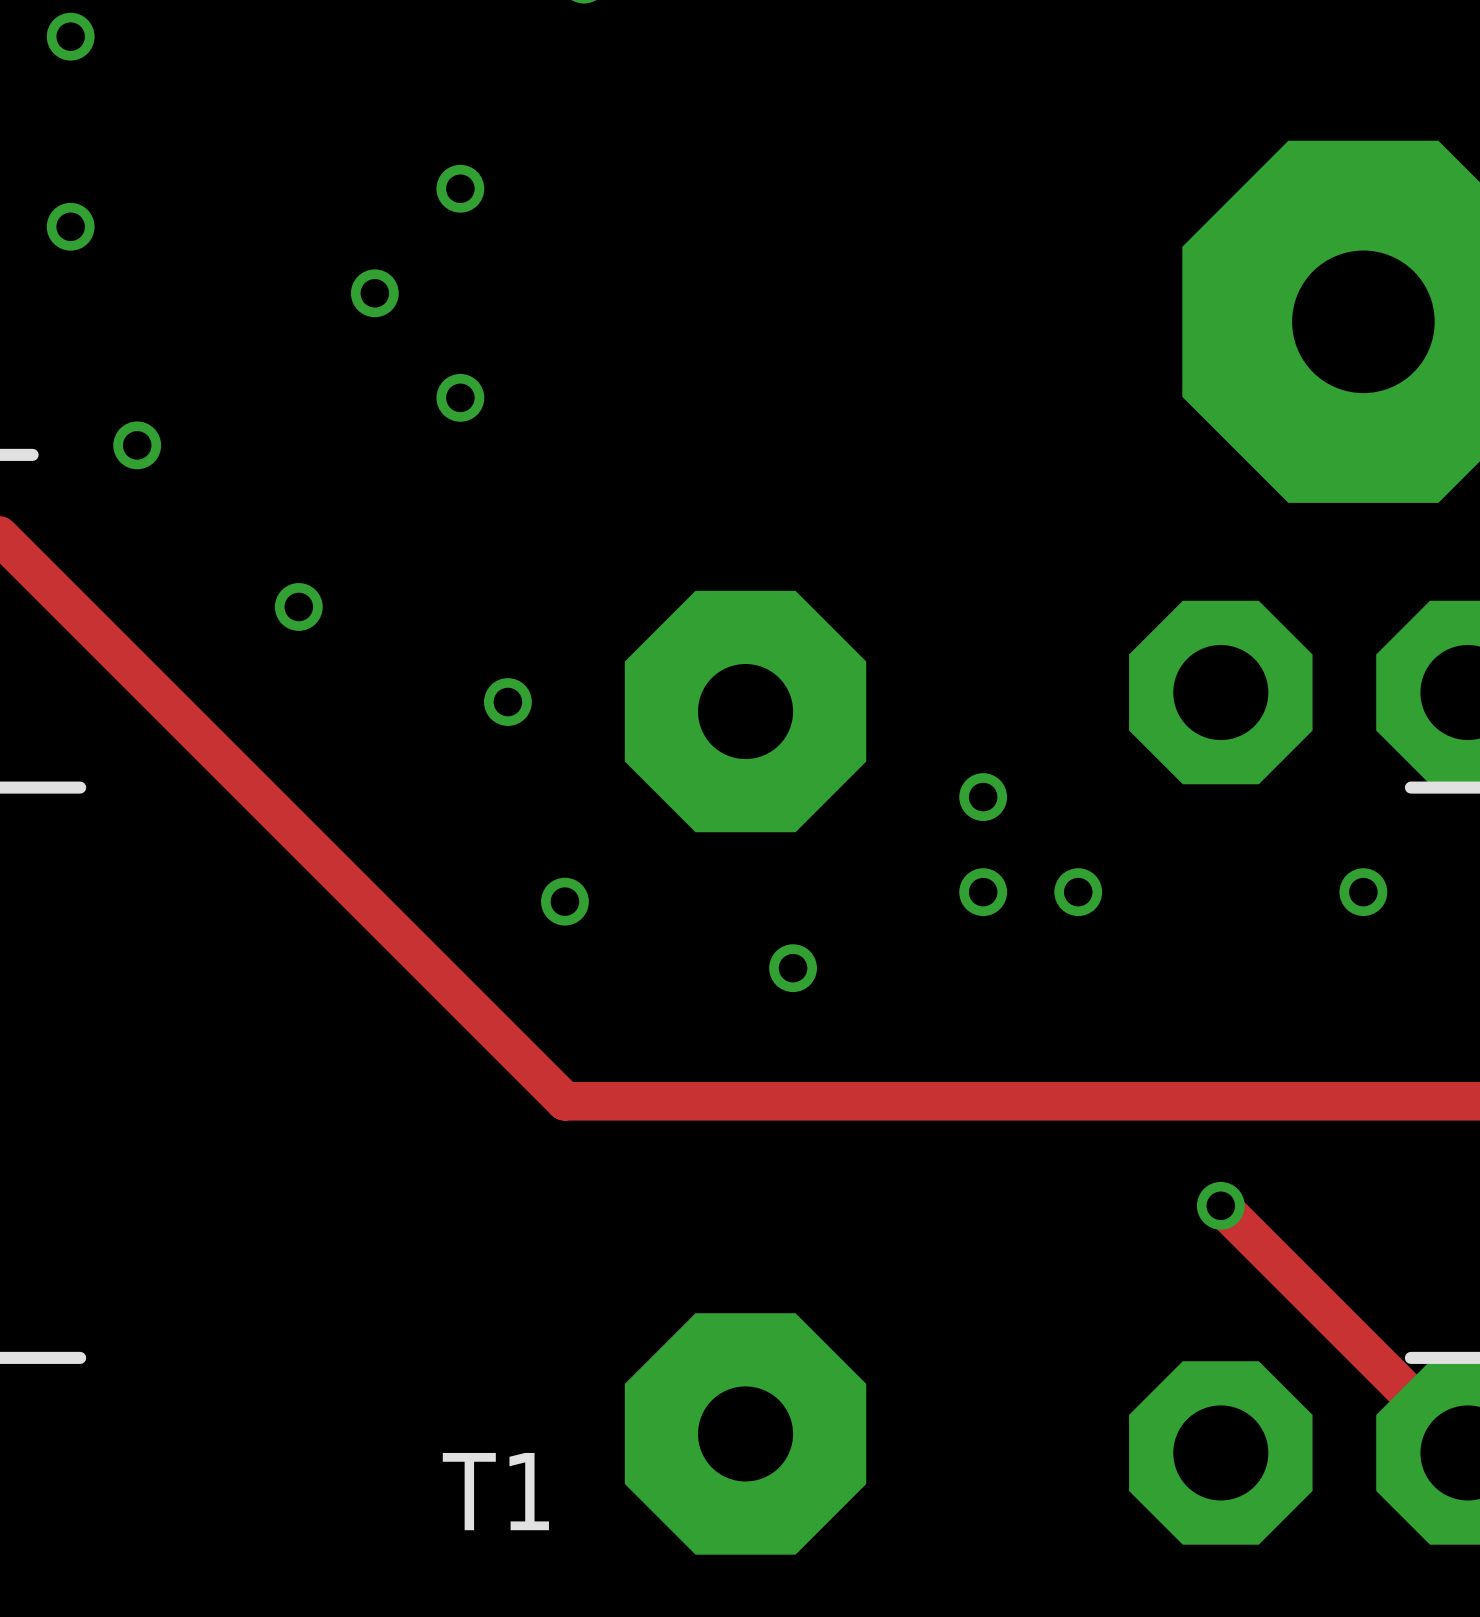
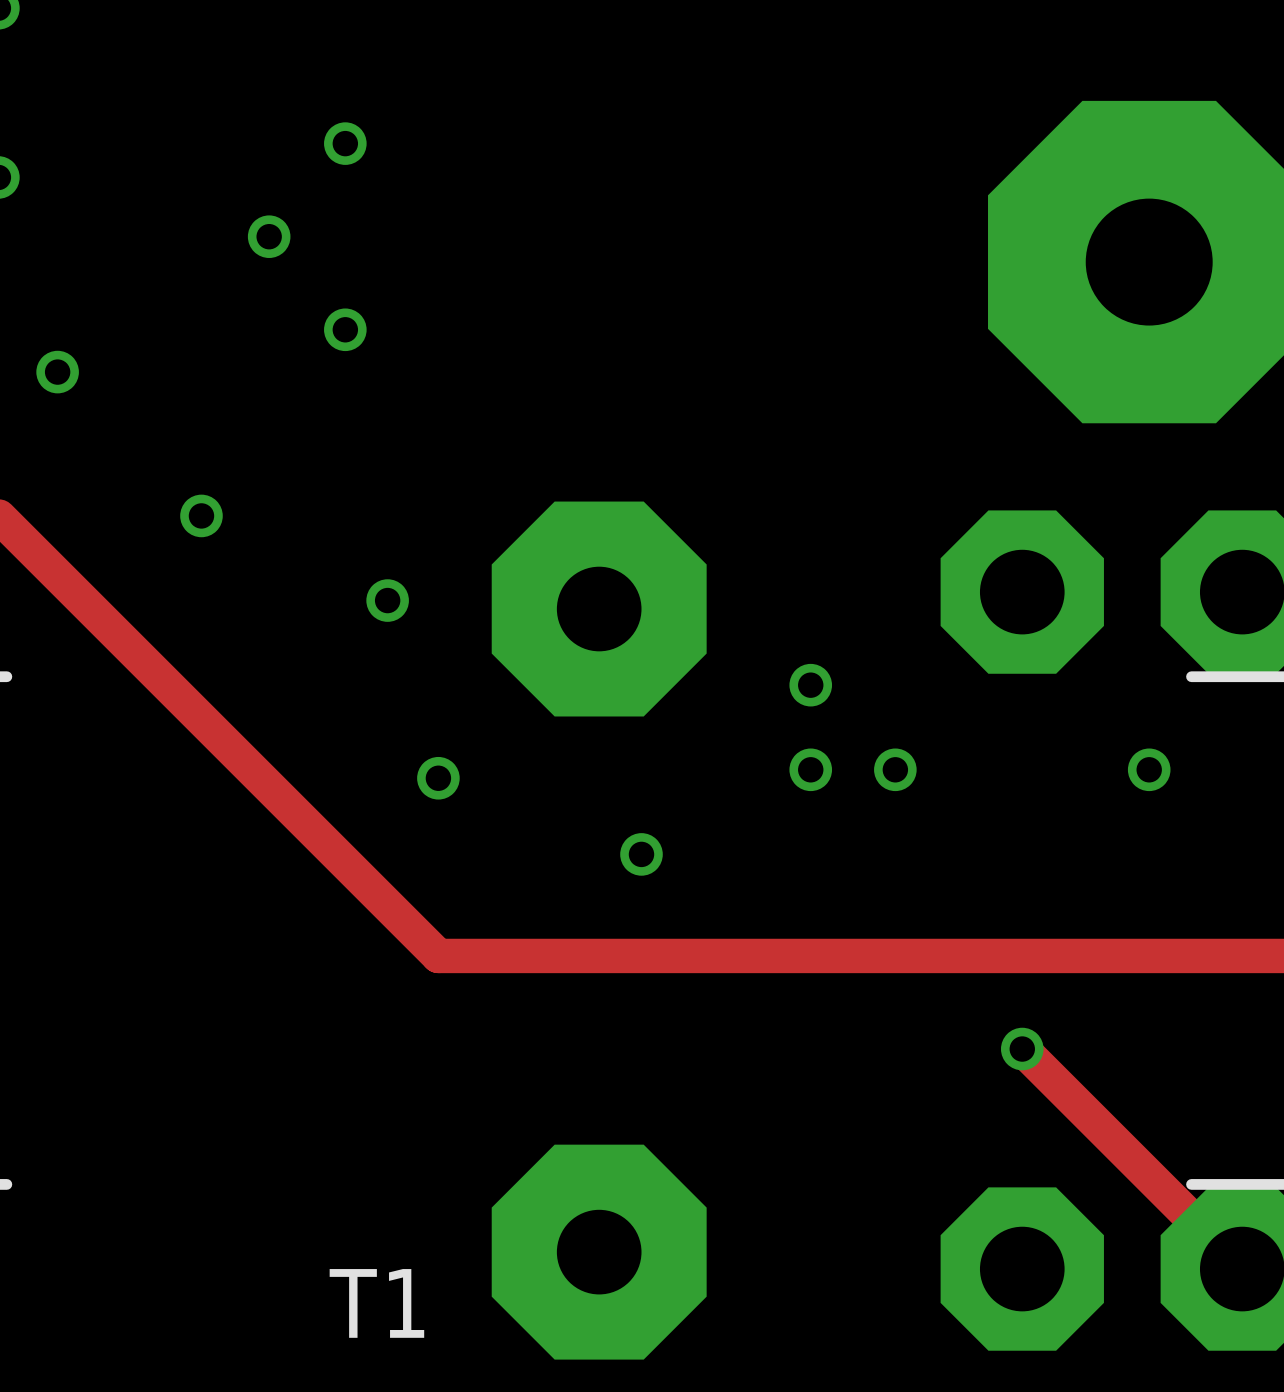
via position: (793, 968) -> (641, 854)

